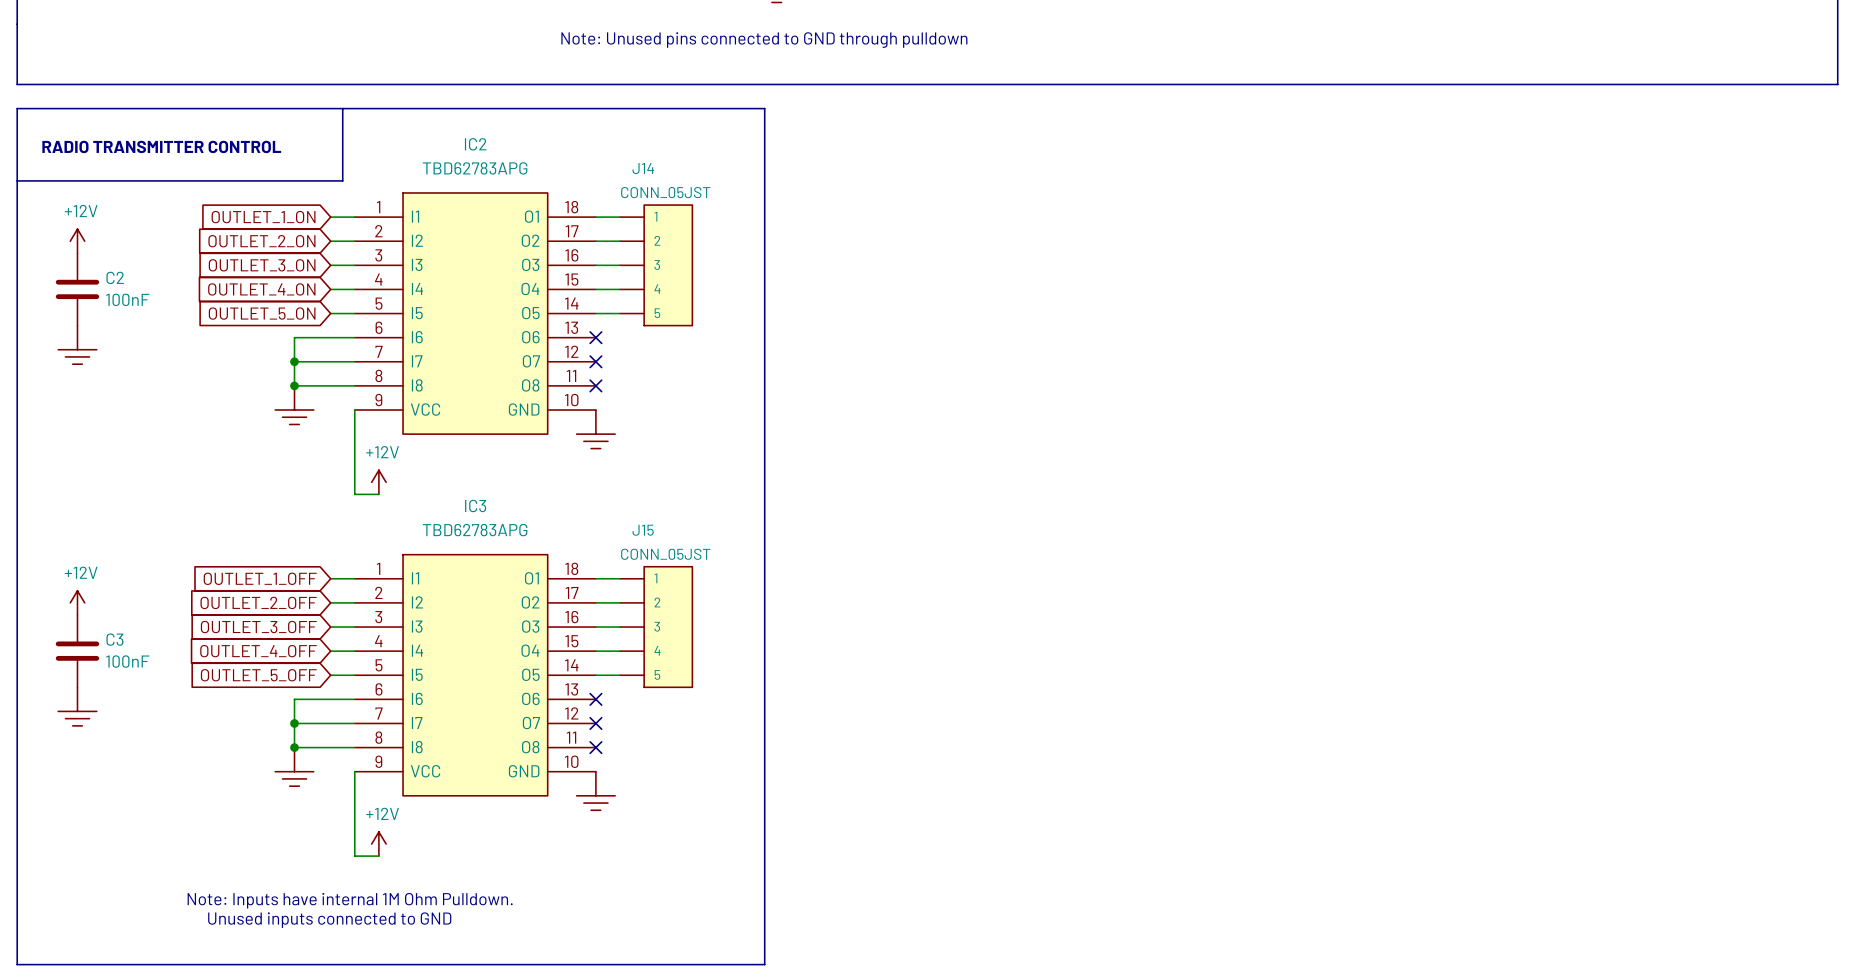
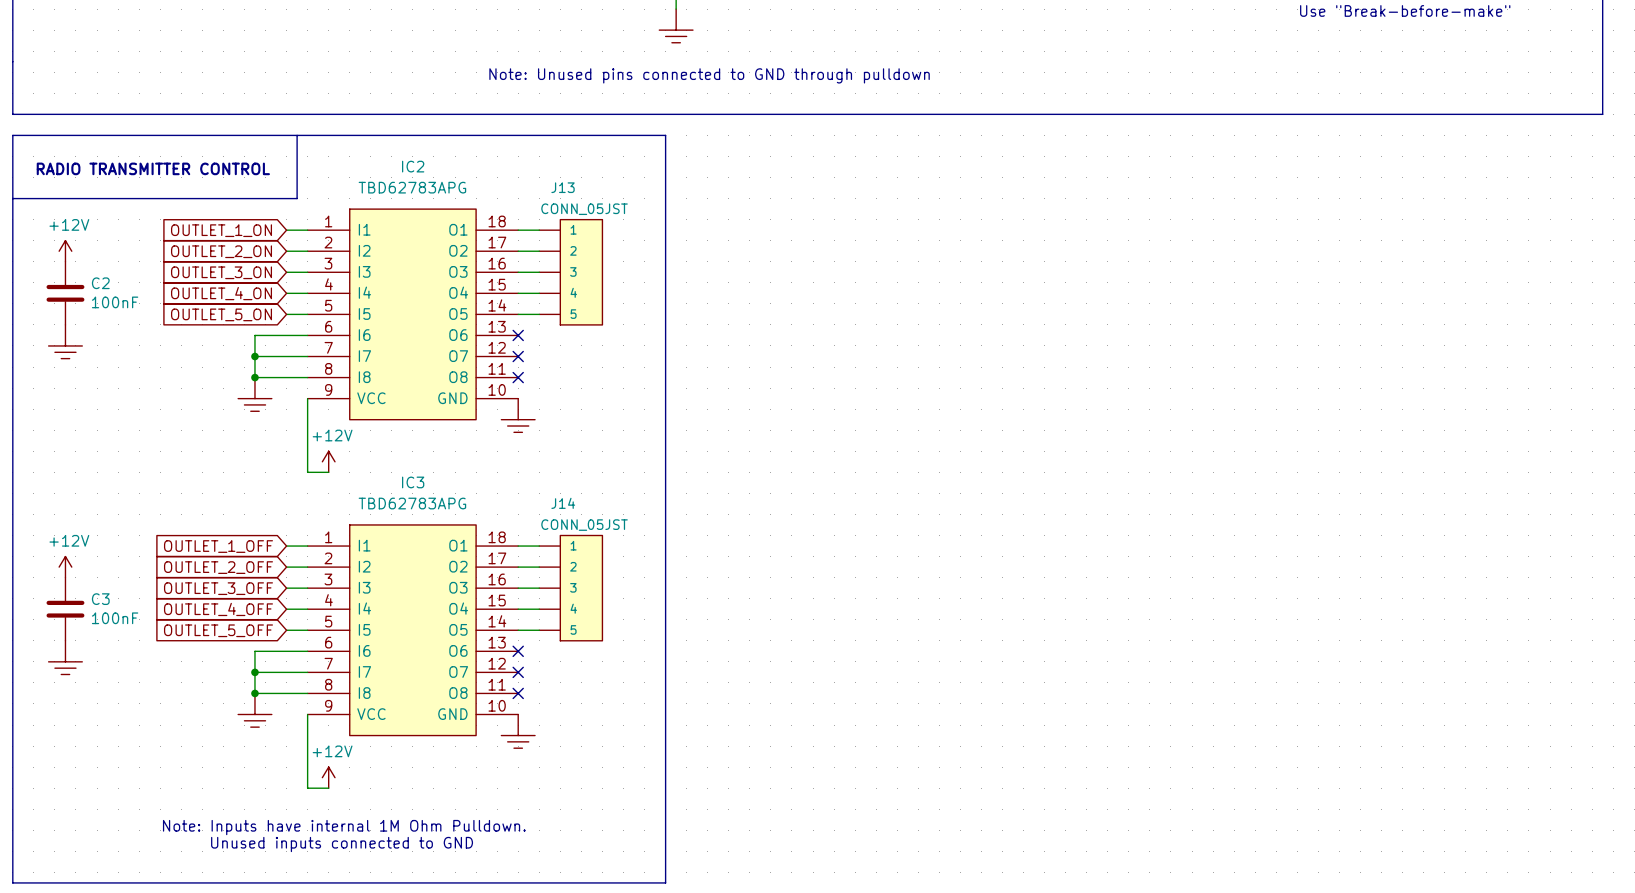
J14 name: J14 (643, 168) -> J13 (563, 187)
J15 name: J15 (643, 530) -> J14 (563, 503)

